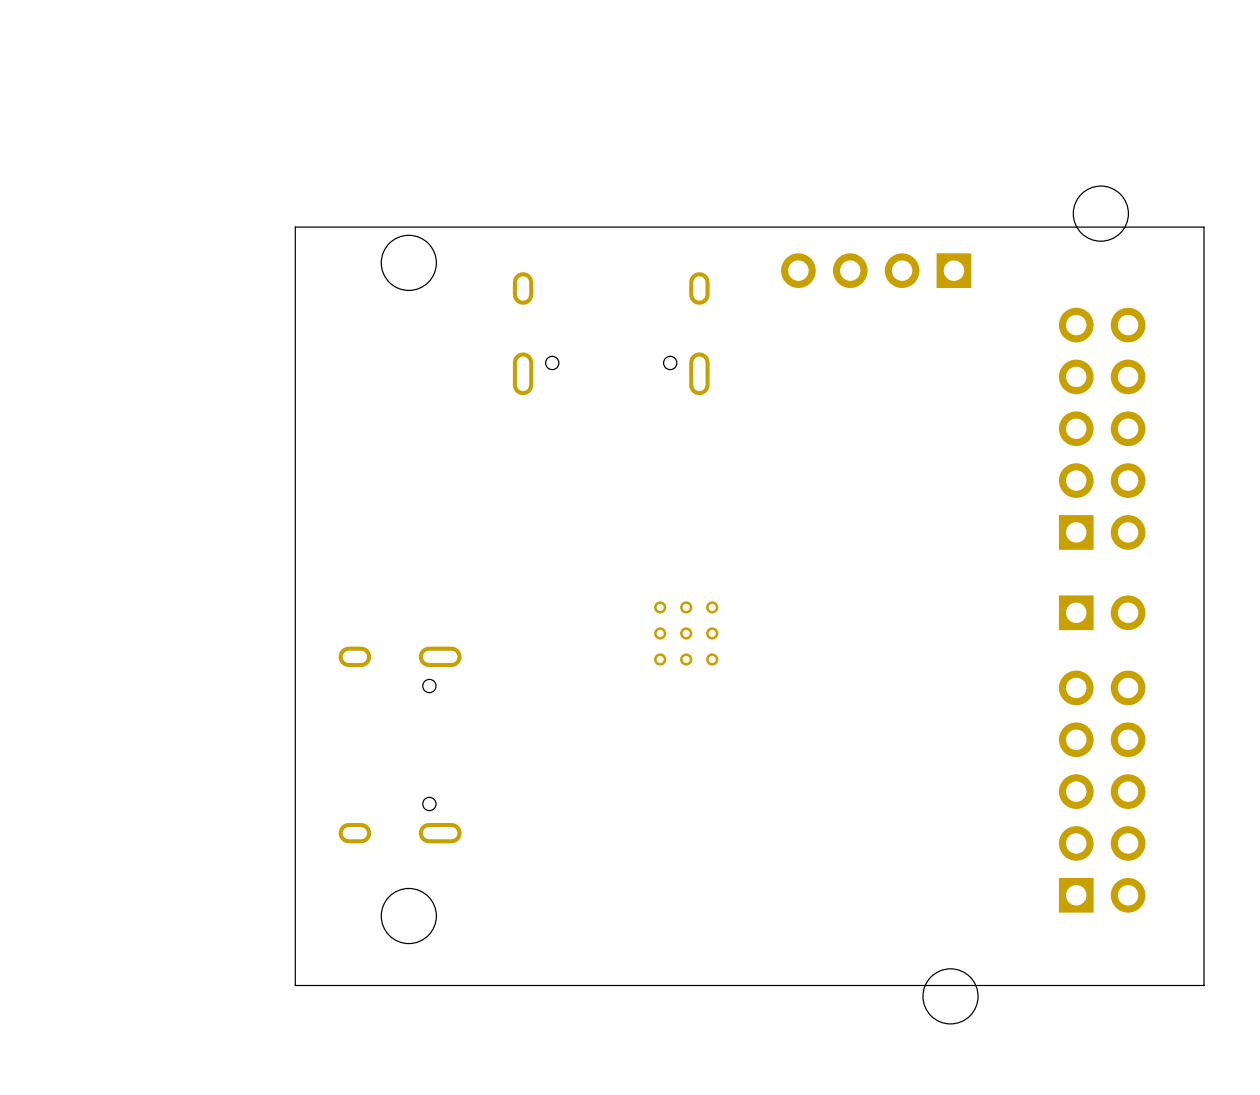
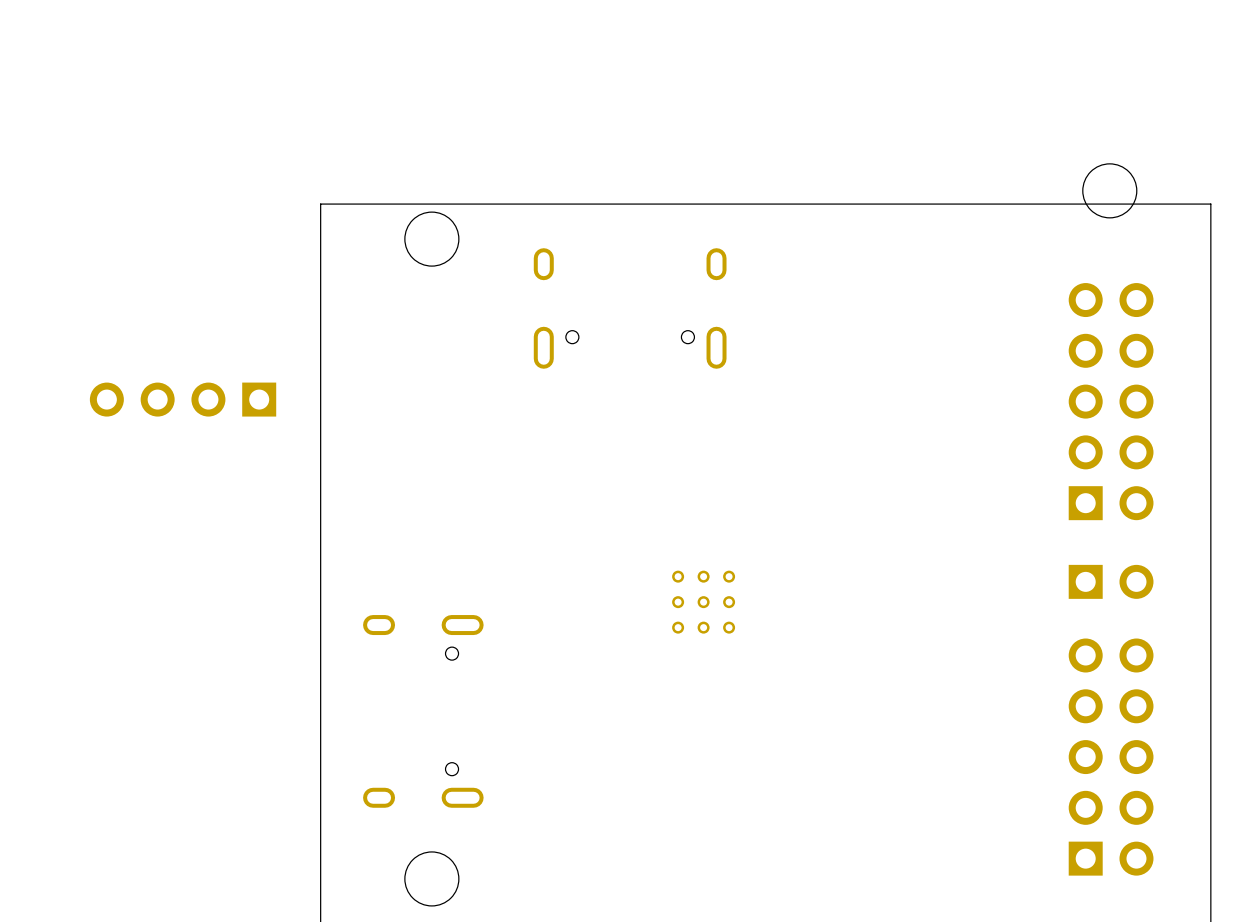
part: (876, 270) -> none
part: none -> (183, 399)

